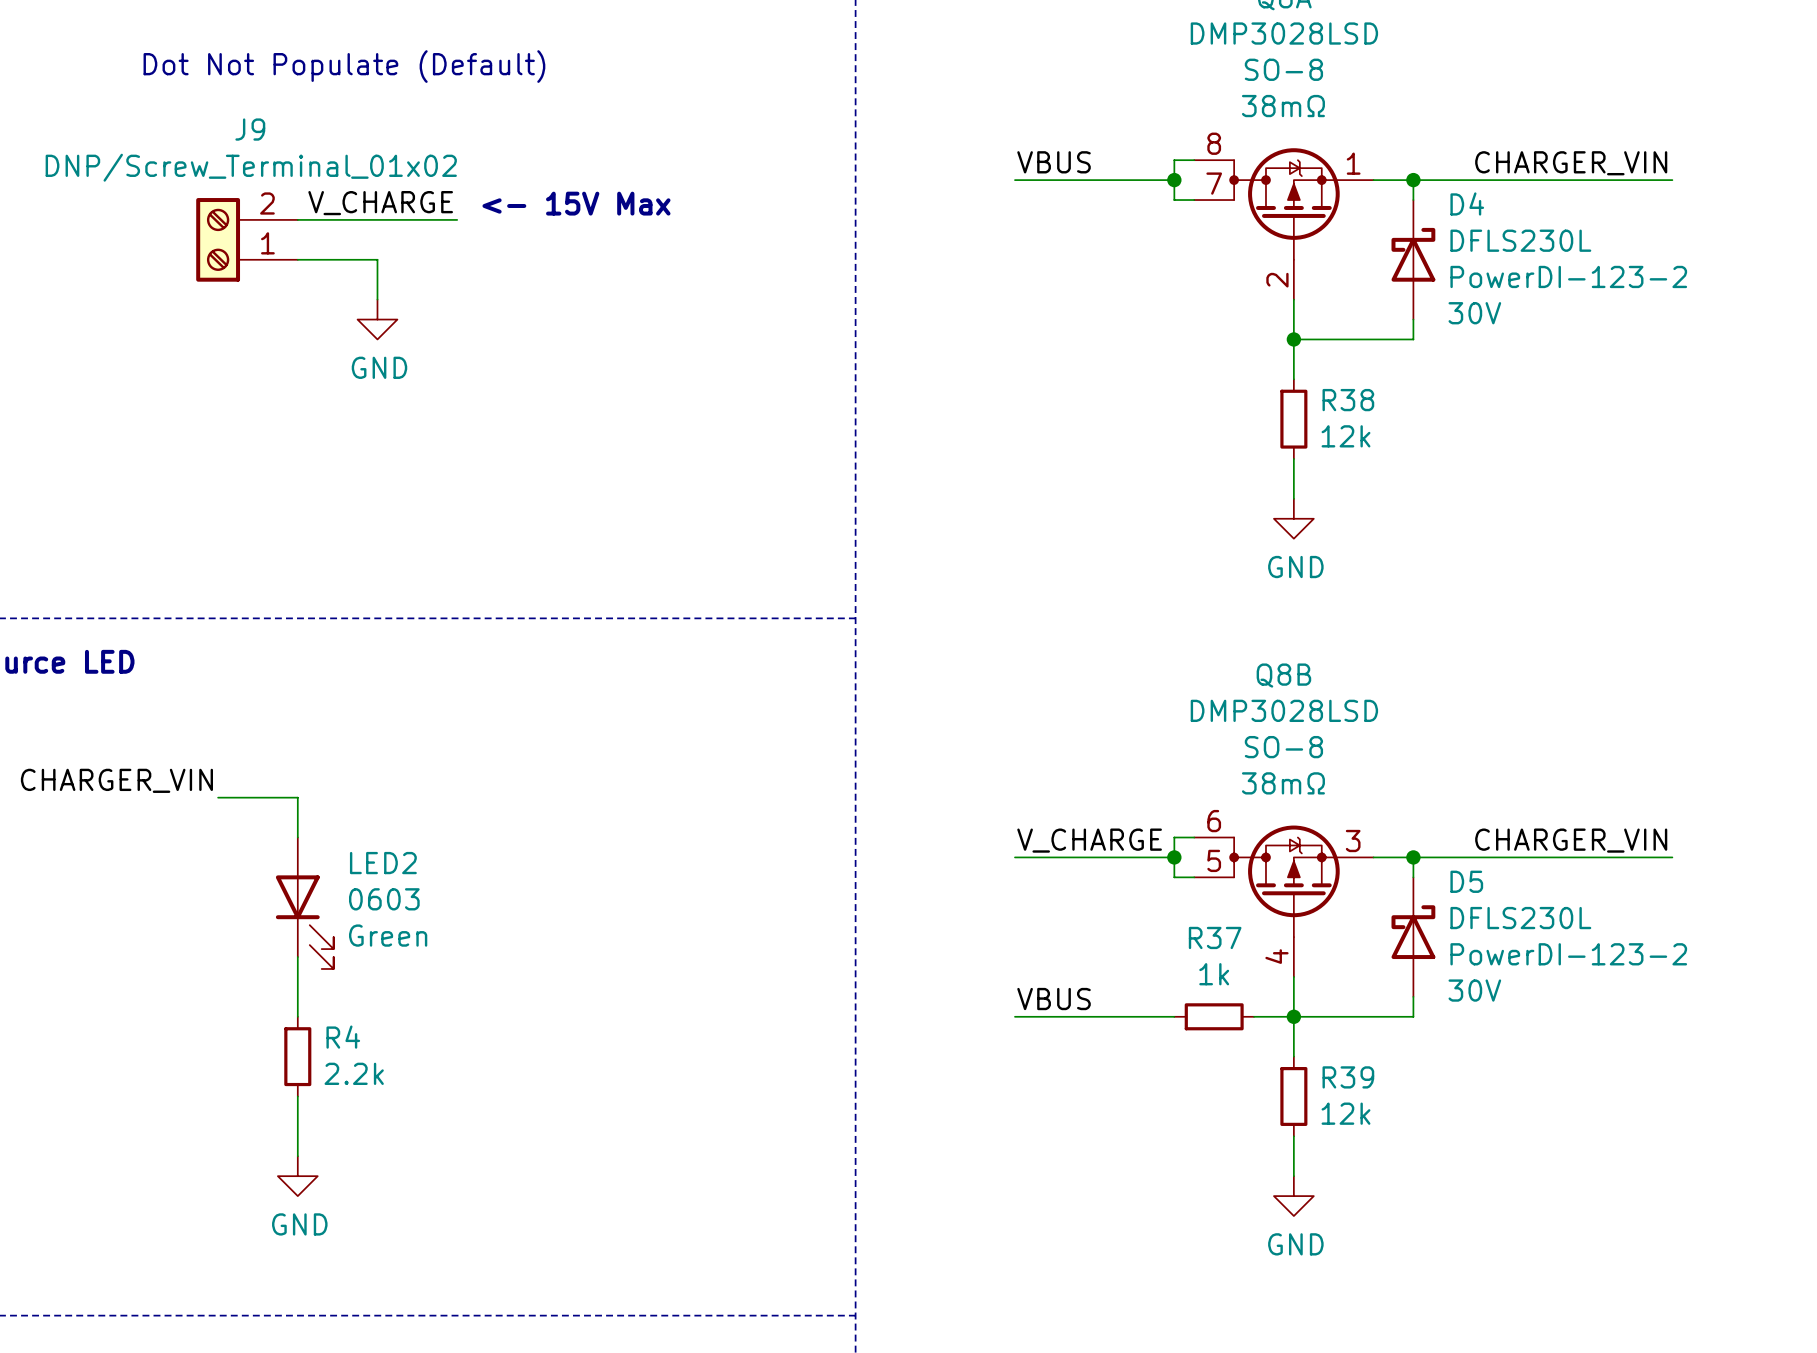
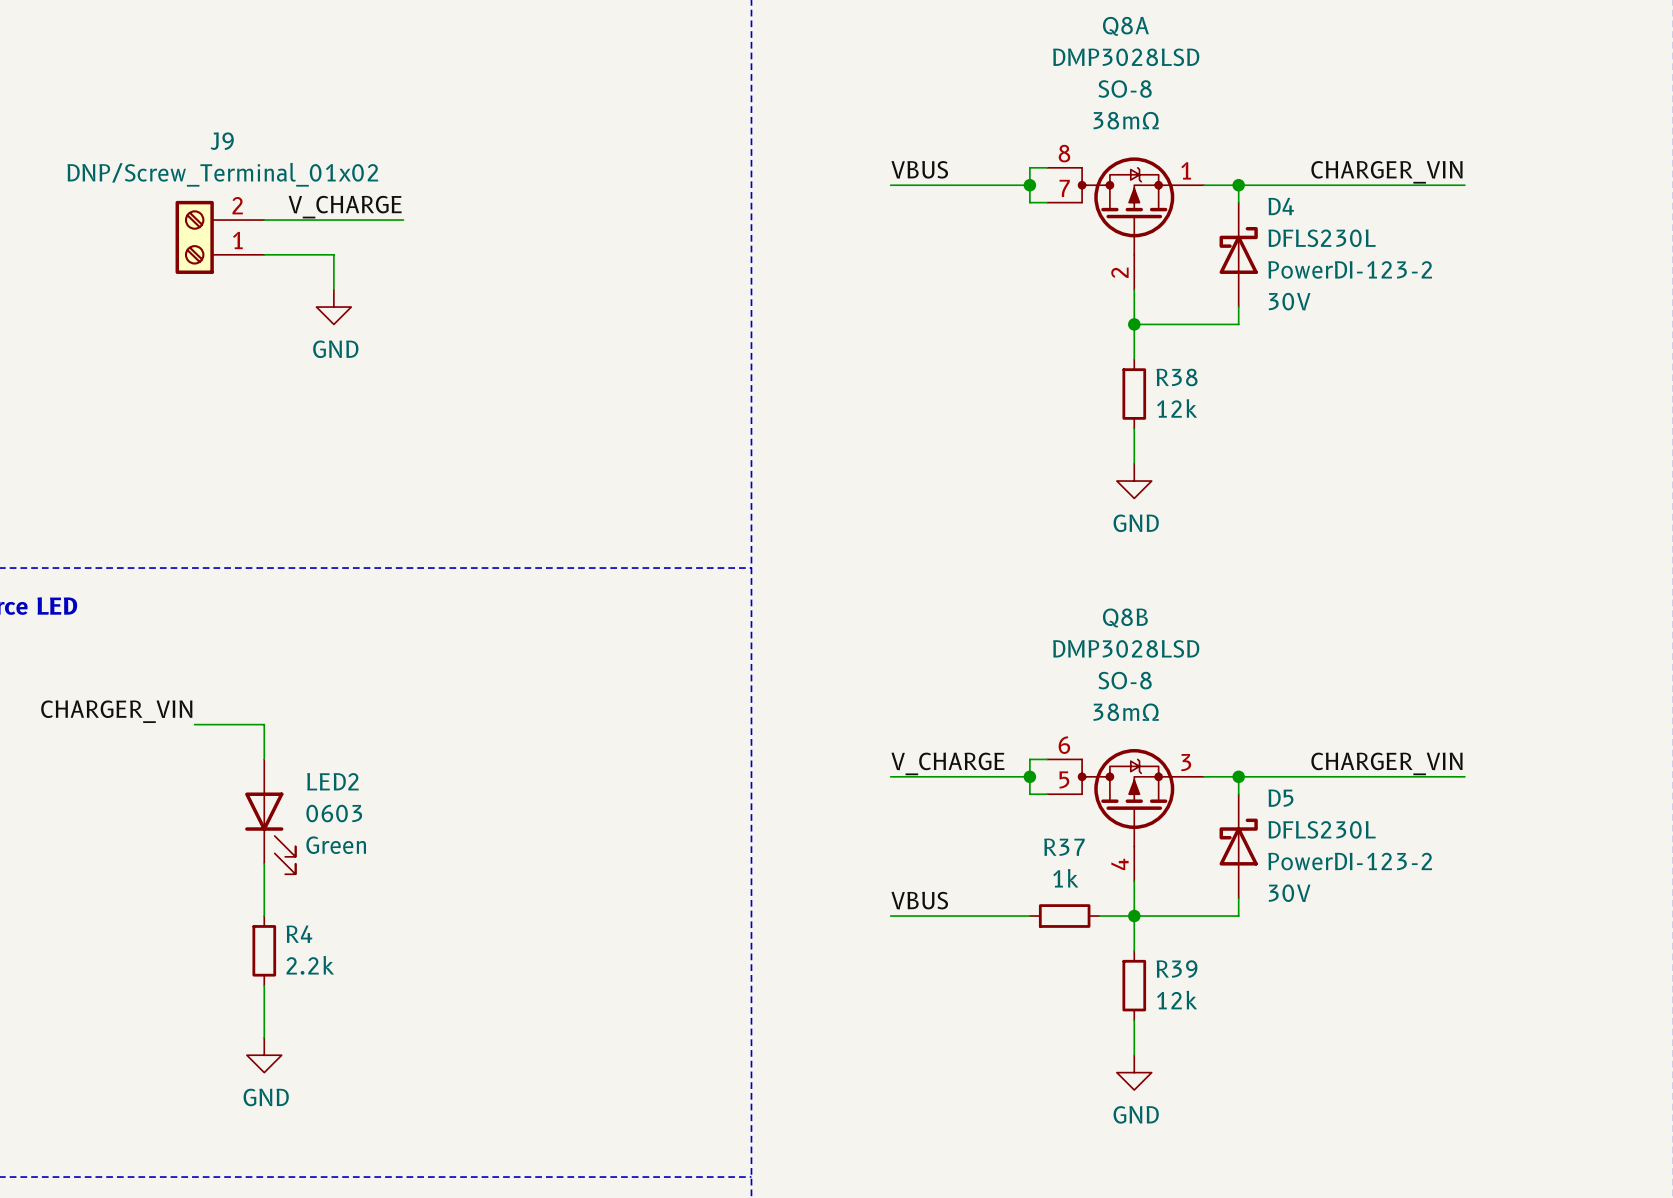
text: Dot Not Populate (Default) (344, 66) -> none
text: <- 15V Max (576, 203) -> none

